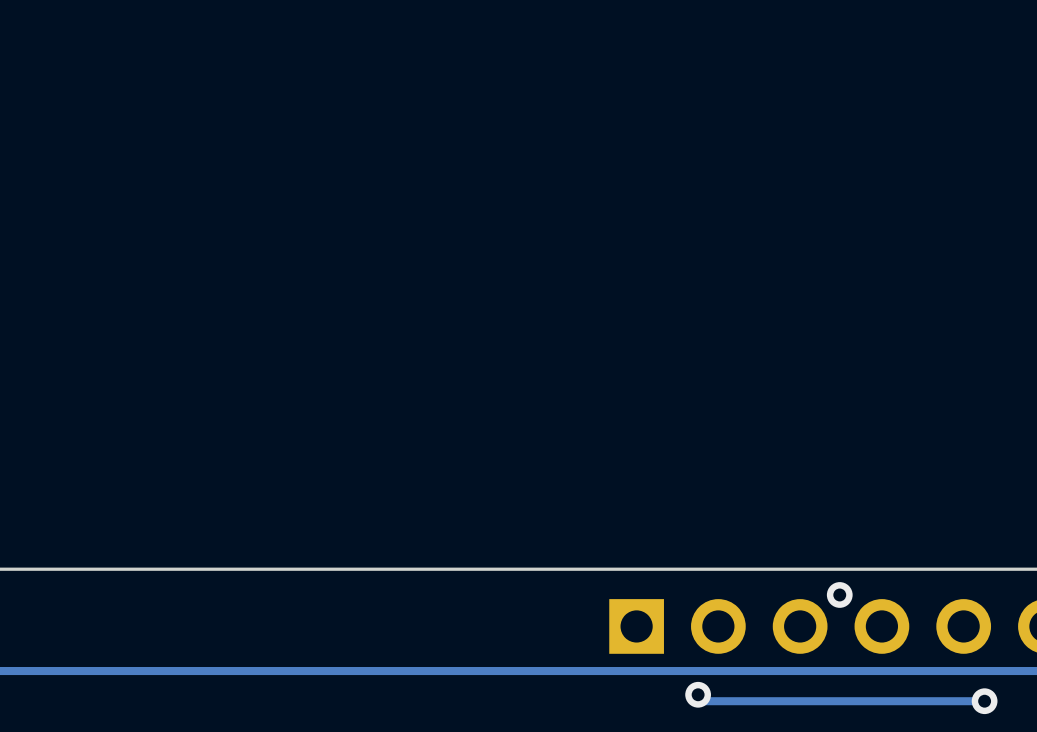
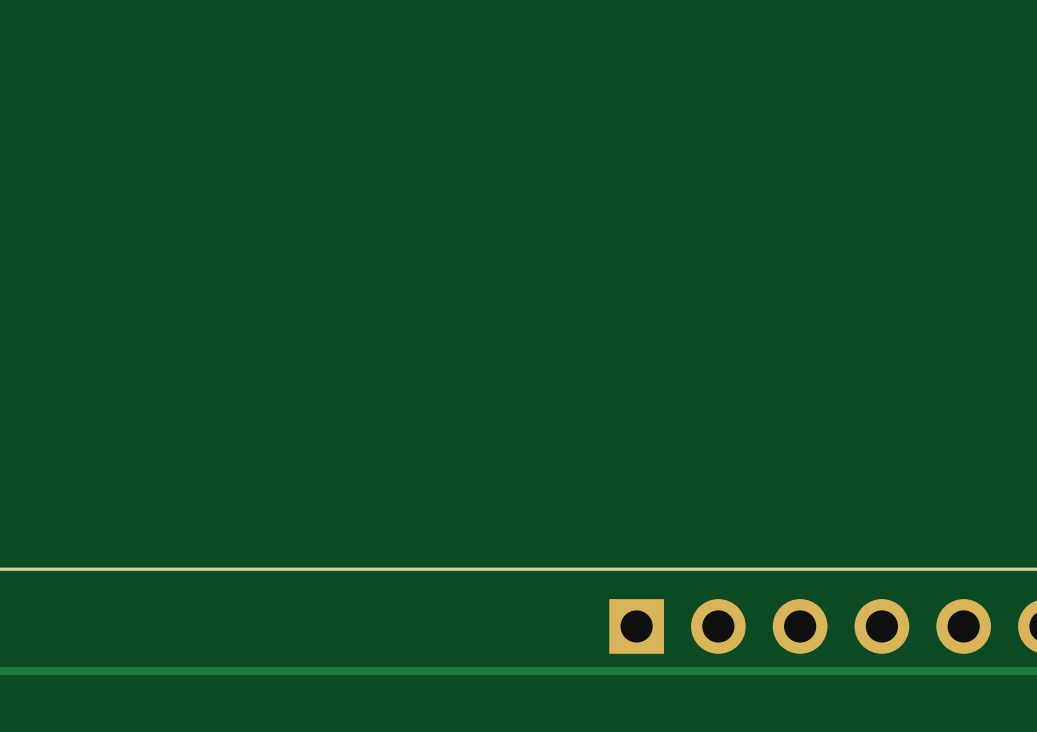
via: (839, 594) -> none
track: (698, 694) (704, 701) (984, 701) -> none
via: (698, 694) -> none
via: (984, 701) -> none

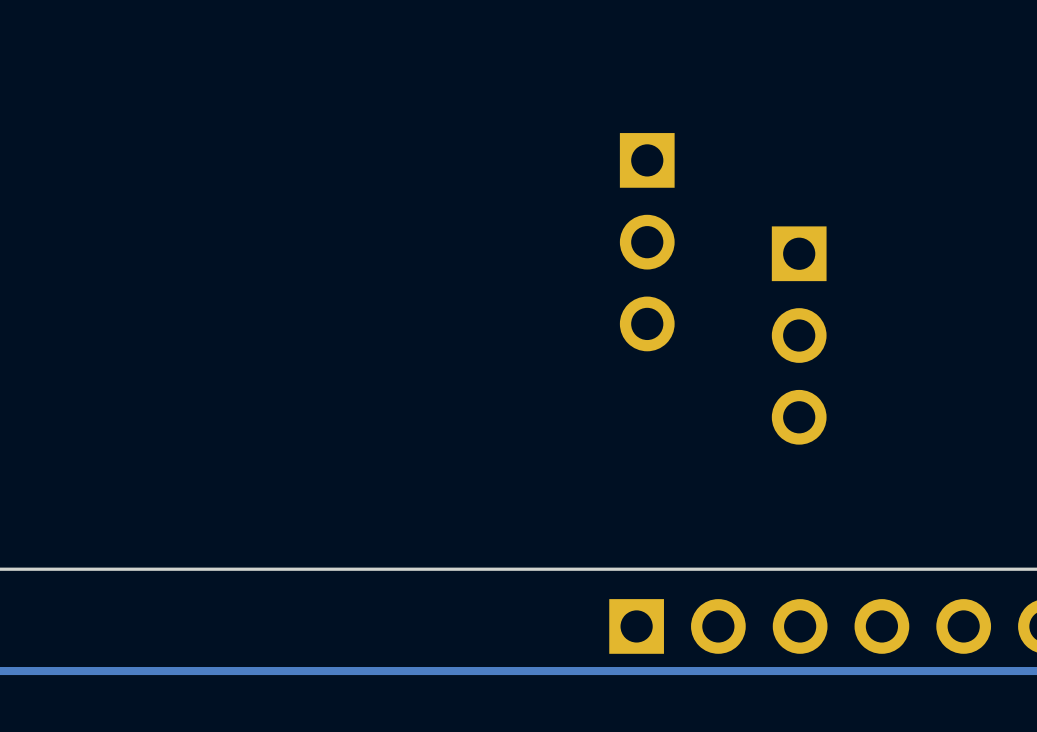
part: none -> (647, 242)
part: none -> (799, 335)

